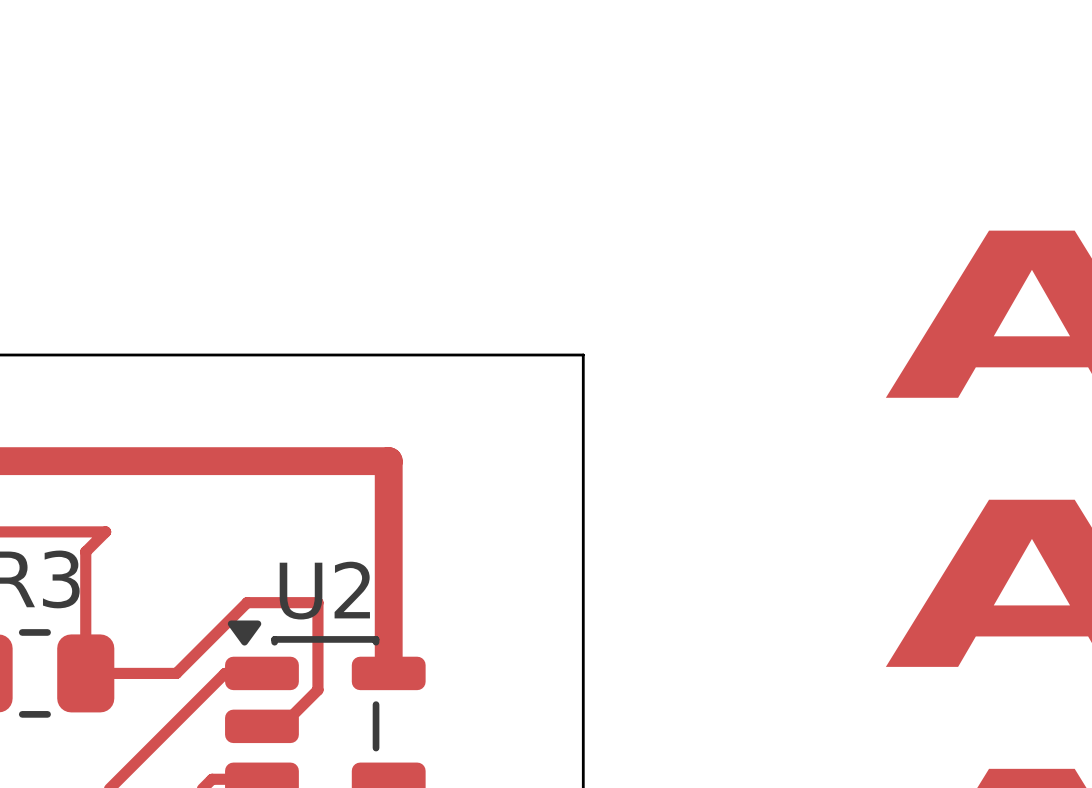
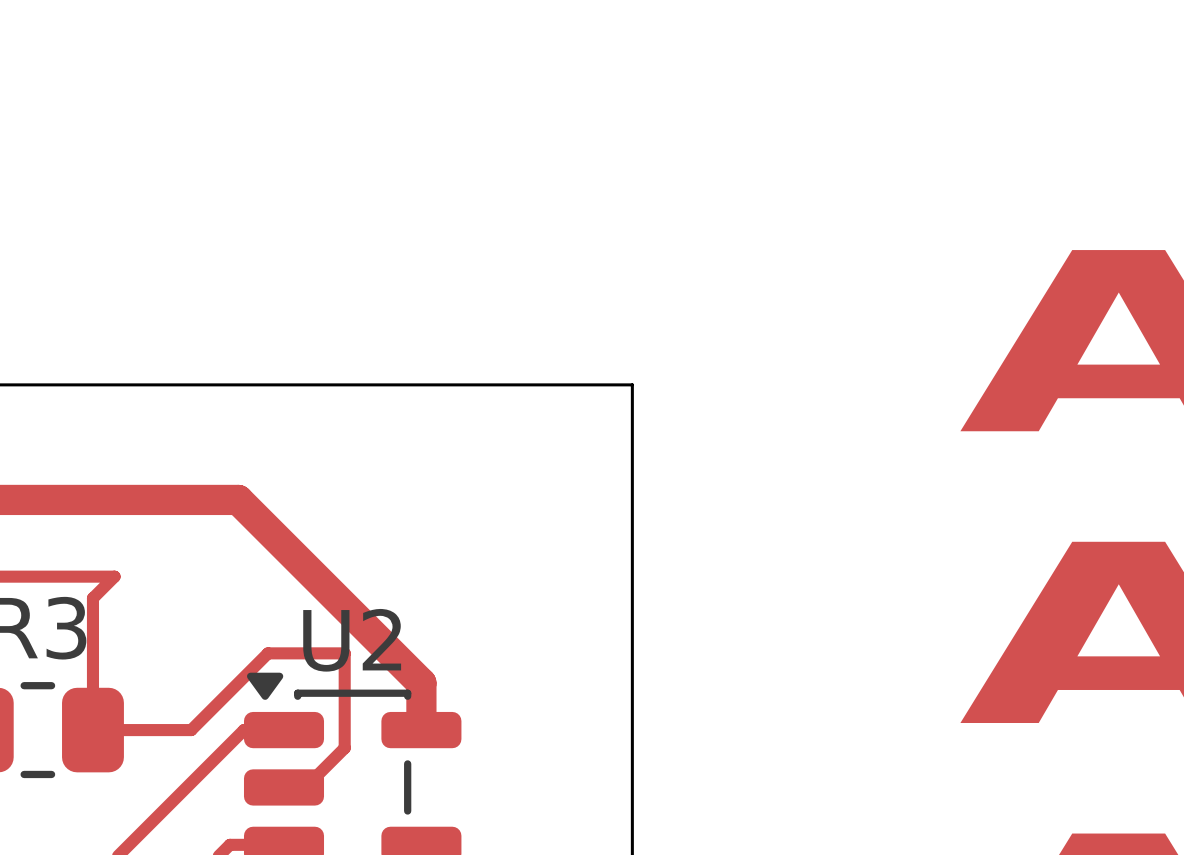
top track: (219, 461) (388, 461) (388, 630) -> (238, 499) (421, 683)

